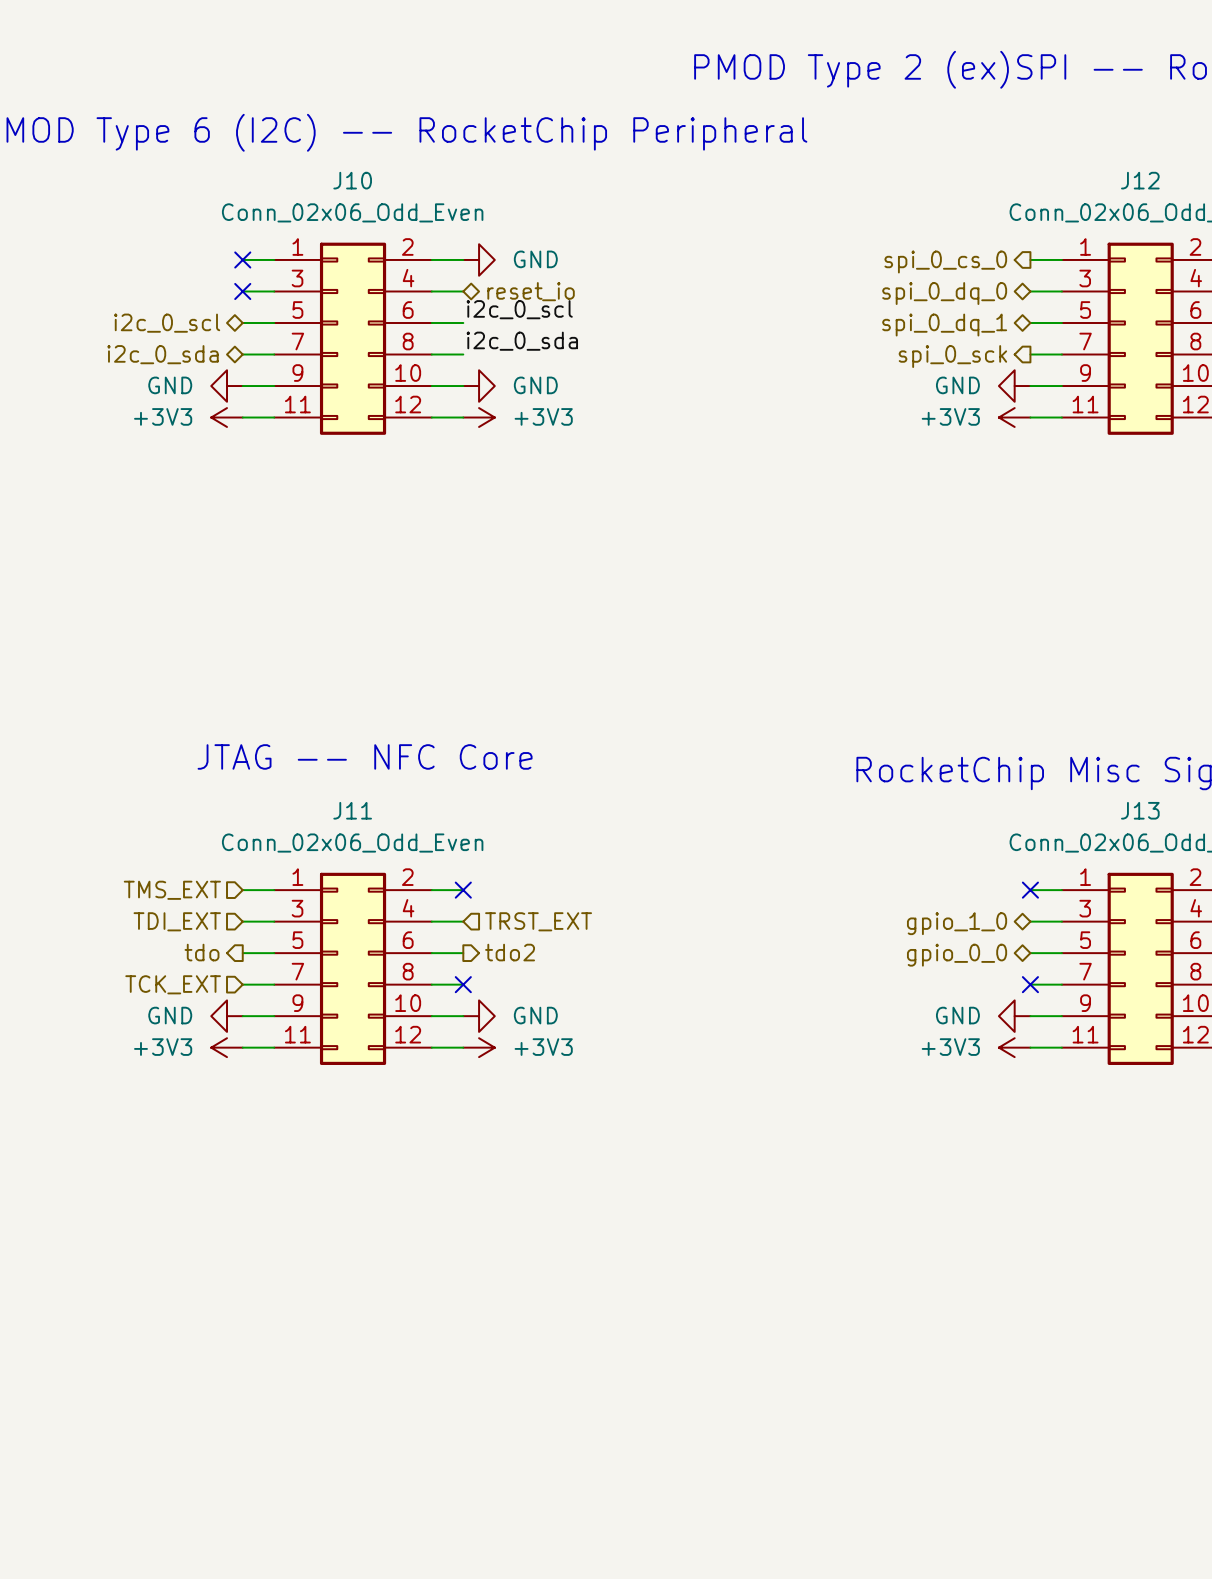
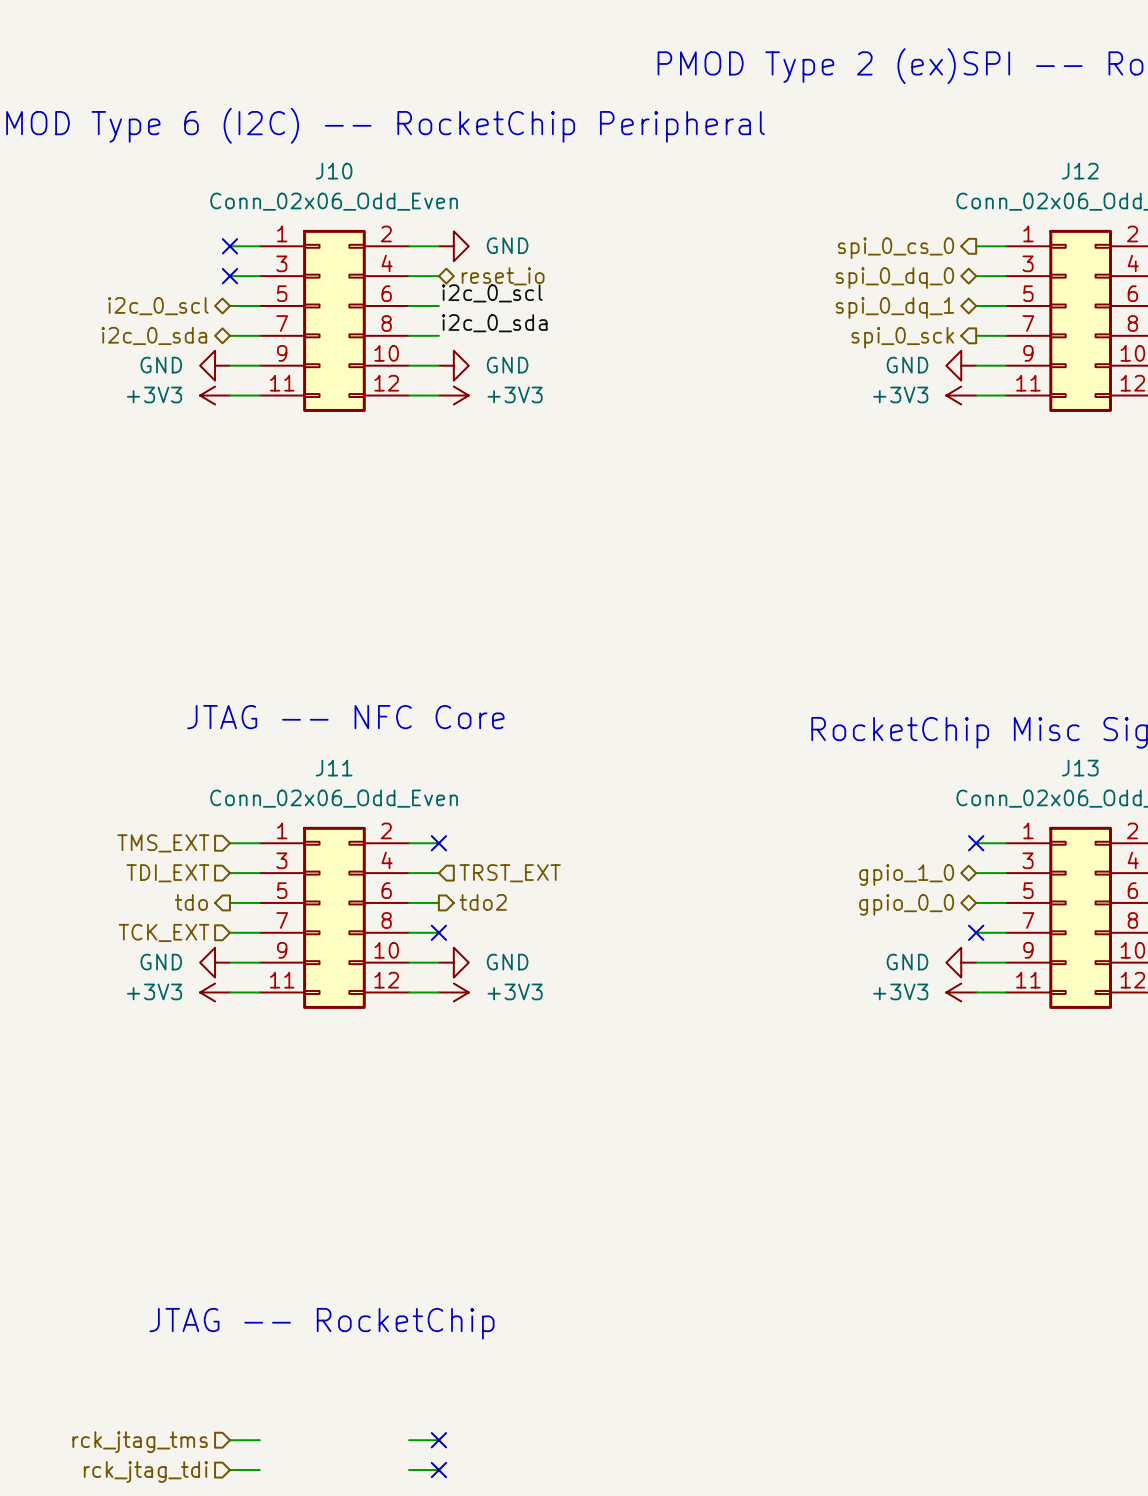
text: none -> JTAG -- RocketChip (321, 1323)
wire: none -> (229, 1440) (259, 1440)
wire: none -> (409, 1440) (438, 1440)
no-connect mark: none -> (438, 1440)
hierarchical label: none -> rck_jtag_tms (140, 1442)
wire: none -> (229, 1470) (259, 1470)
wire: none -> (409, 1470) (438, 1470)
no-connect mark: none -> (438, 1470)
hierarchical label: none -> rck_jtag_tdi (145, 1471)

